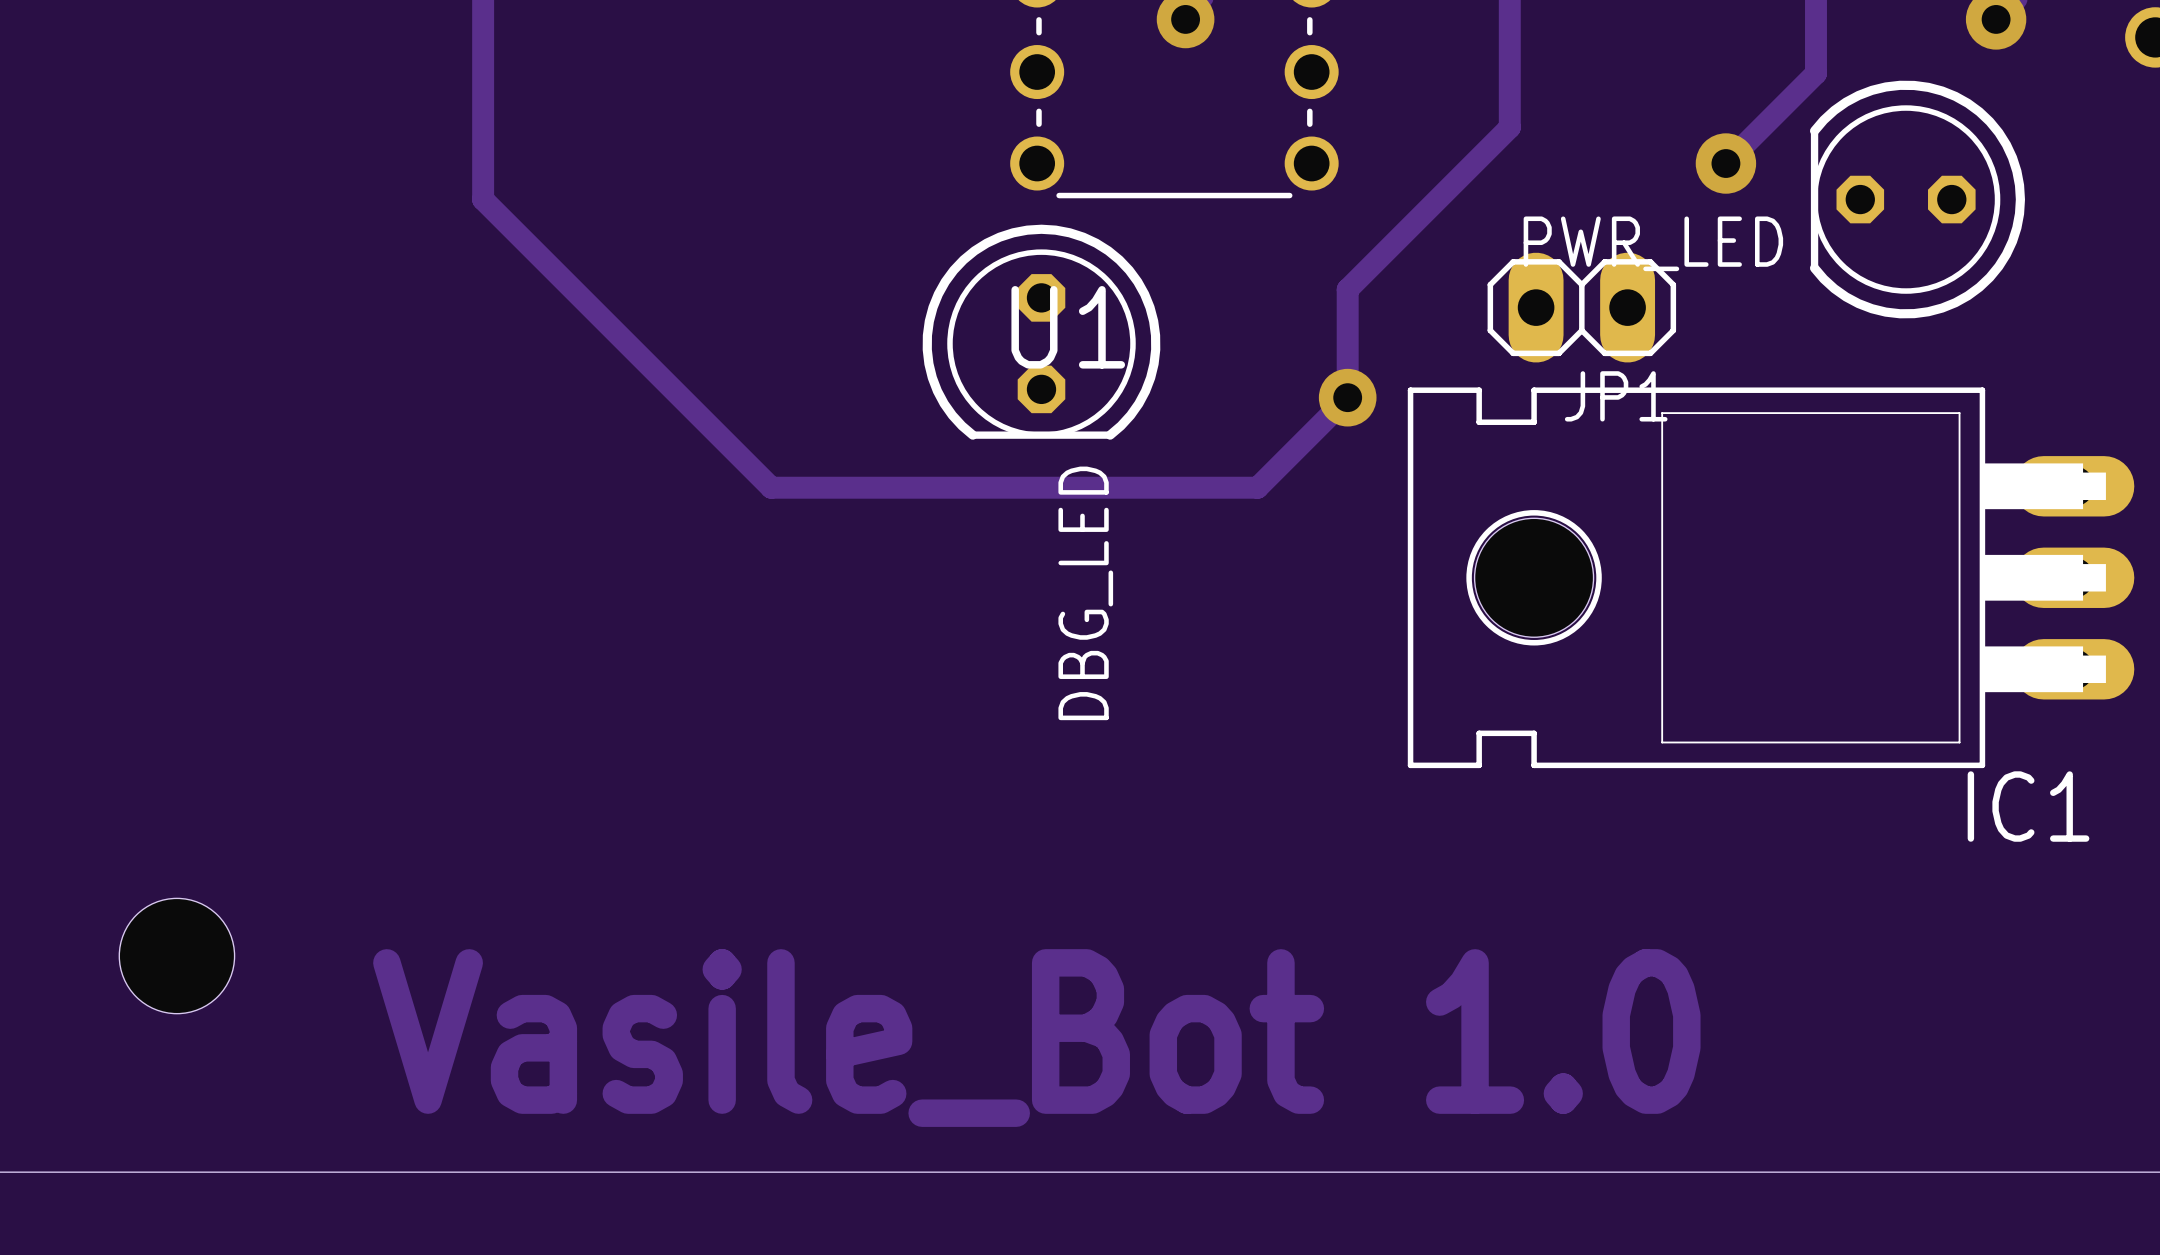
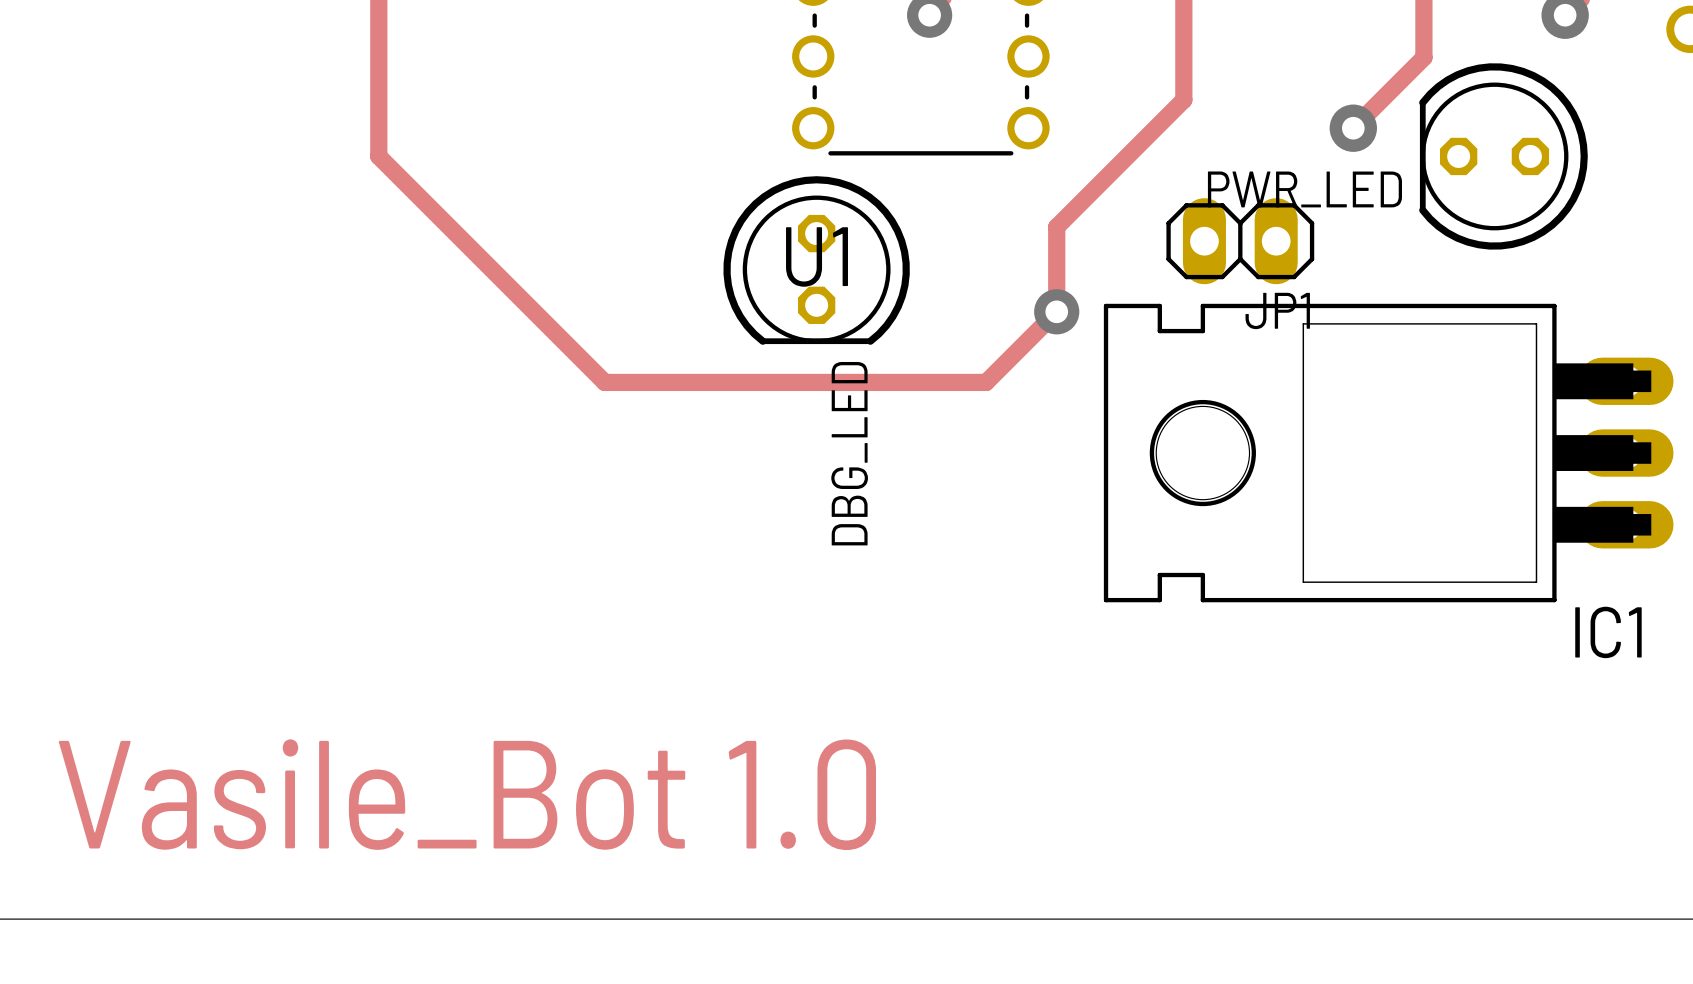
hole: (176, 956) -> none
text position: Vasile_Bot 1.0 (1036, 1038) -> Vasile_Bot 1.0 (467, 794)

